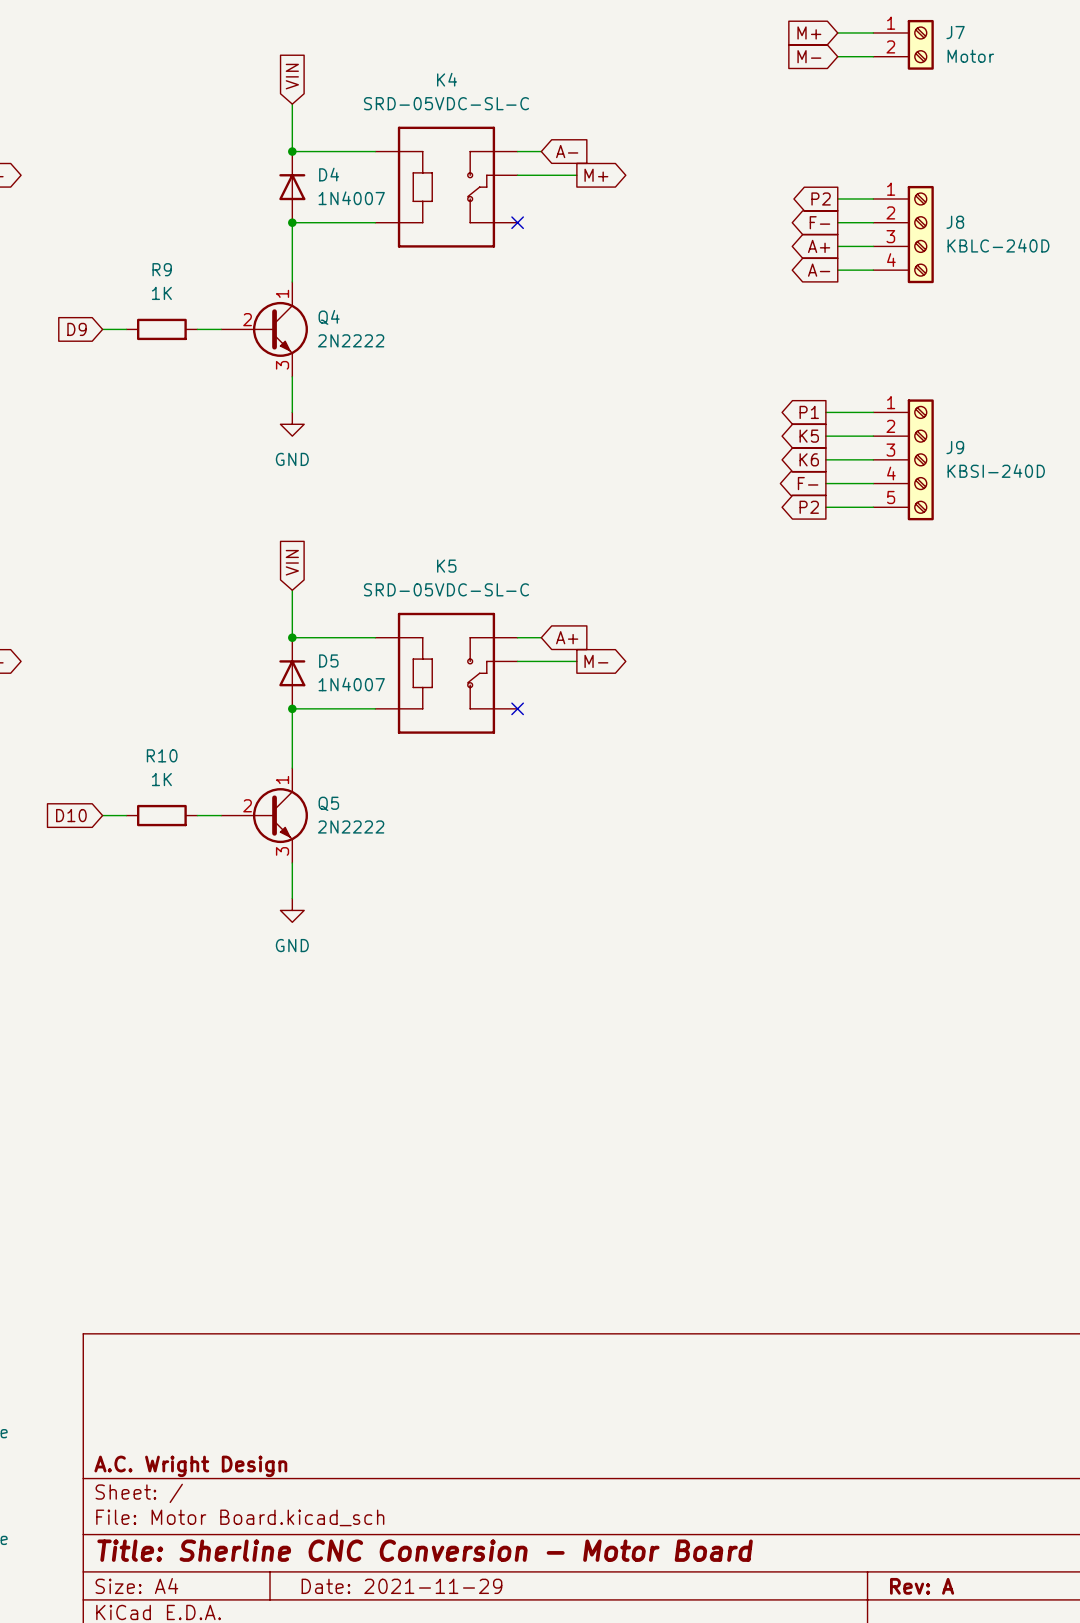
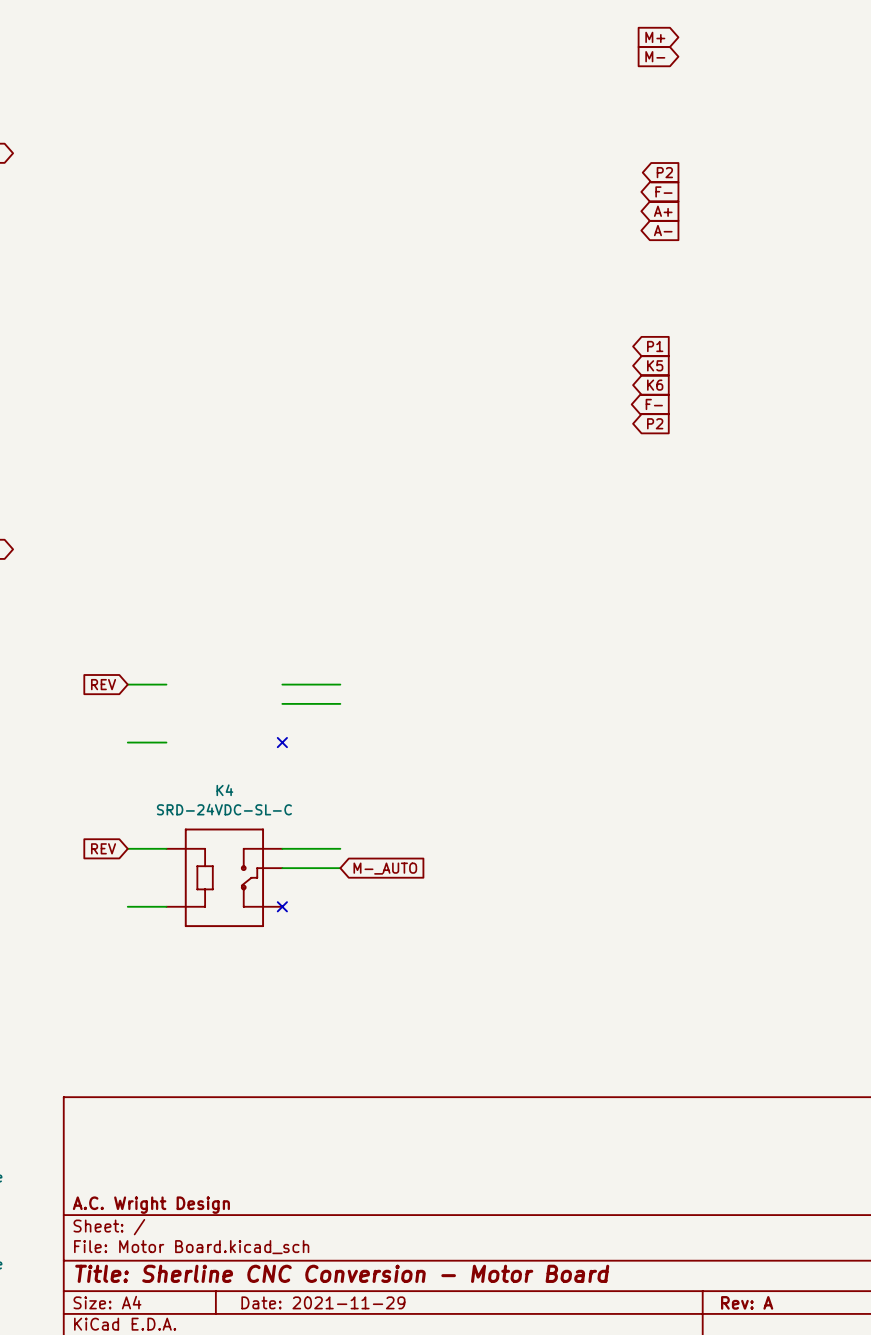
wire: (837, 32) (873, 32) -> none
J7: Motor (903, 44) -> none
wire: (837, 56) (873, 56) -> none
global label: VIN (292, 76) -> none
K4 value: SRD-05VDC-SL-C (446, 103) -> SRD-24VDC-SL-C (224, 809)
wire: (292, 104) (292, 151) (375, 151) -> none
junction: (292, 151) -> none
wire: (517, 151) (541, 151) -> none
global label: A- (567, 151) -> none
wire: (517, 175) (576, 175) -> none
global label: M+ (596, 175) -> none
D4: 1N4007 (292, 187) -> none
K4 position: (446, 187) -> (224, 877)
wire: (837, 198) (873, 198) -> none
junction: (292, 222) -> none
wire: (375, 222) (292, 222) (292, 281) -> none
no-connect mark: (517, 222) -> none
wire: (837, 222) (873, 222) -> none
J8: KBLC-240D (903, 234) -> none
wire: (837, 246) (873, 246) -> none
wire: (837, 270) (873, 270) -> none
global label: D9 (77, 329) -> none
wire: (102, 329) (126, 329) -> none
R9: 1K (161, 329) -> none
wire: (197, 329) (221, 329) -> none
Q4: 2N2222 (264, 329) -> none
wire: (292, 376) (292, 412) -> none
wire: (825, 412) (873, 412) -> none
power symbol: GND (292, 424) -> none
wire: (825, 436) (873, 436) -> none
wire: (825, 459) (873, 459) -> none
J9: KBSI-240D (903, 459) -> none
wire: (825, 483) (873, 483) -> none
wire: (825, 507) (873, 507) -> none
global label: VIN (292, 562) -> none
wire: (292, 590) (292, 637) (375, 637) -> none
junction: (292, 637) -> none
wire: (517, 637) (541, 637) -> none
global label: A+ (567, 637) -> none
wire: (517, 661) (576, 661) -> none
global label: M- (596, 661) -> none
D5: 1N4007 (292, 673) -> none
K5: SRD-05VDC-SL-C (446, 673) -> none
junction: (292, 708) -> none
wire: (375, 708) (292, 708) (292, 768) -> none
no-connect mark: (517, 708) -> none
global label: D10 (71, 815) -> none
R10: 1K (161, 815) -> none
wire: (197, 815) (221, 815) -> none
Q5: 2N2222 (264, 815) -> none
global label: none -> REV (103, 684)
wire: none -> (127, 684) (166, 684)
wire: none -> (282, 684) (340, 684)
wire: none -> (282, 703) (340, 703)
wire: (292, 863) (292, 898) -> none
wire: none -> (127, 742) (166, 742)
no-connect mark: none -> (282, 742)
power symbol: GND (292, 910) -> none
global label: none -> REV (103, 848)
wire: none -> (127, 848) (166, 848)
wire: none -> (282, 848) (340, 848)
wire: none -> (282, 868) (340, 868)
global label: none -> M-_AUTO (385, 868)
wire: none -> (127, 906) (166, 906)
no-connect mark: none -> (282, 906)

